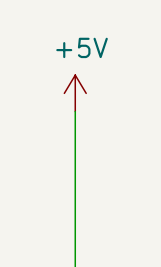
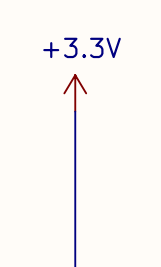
power symbol: +5V (75, 93) -> +3.3V (75, 93)

